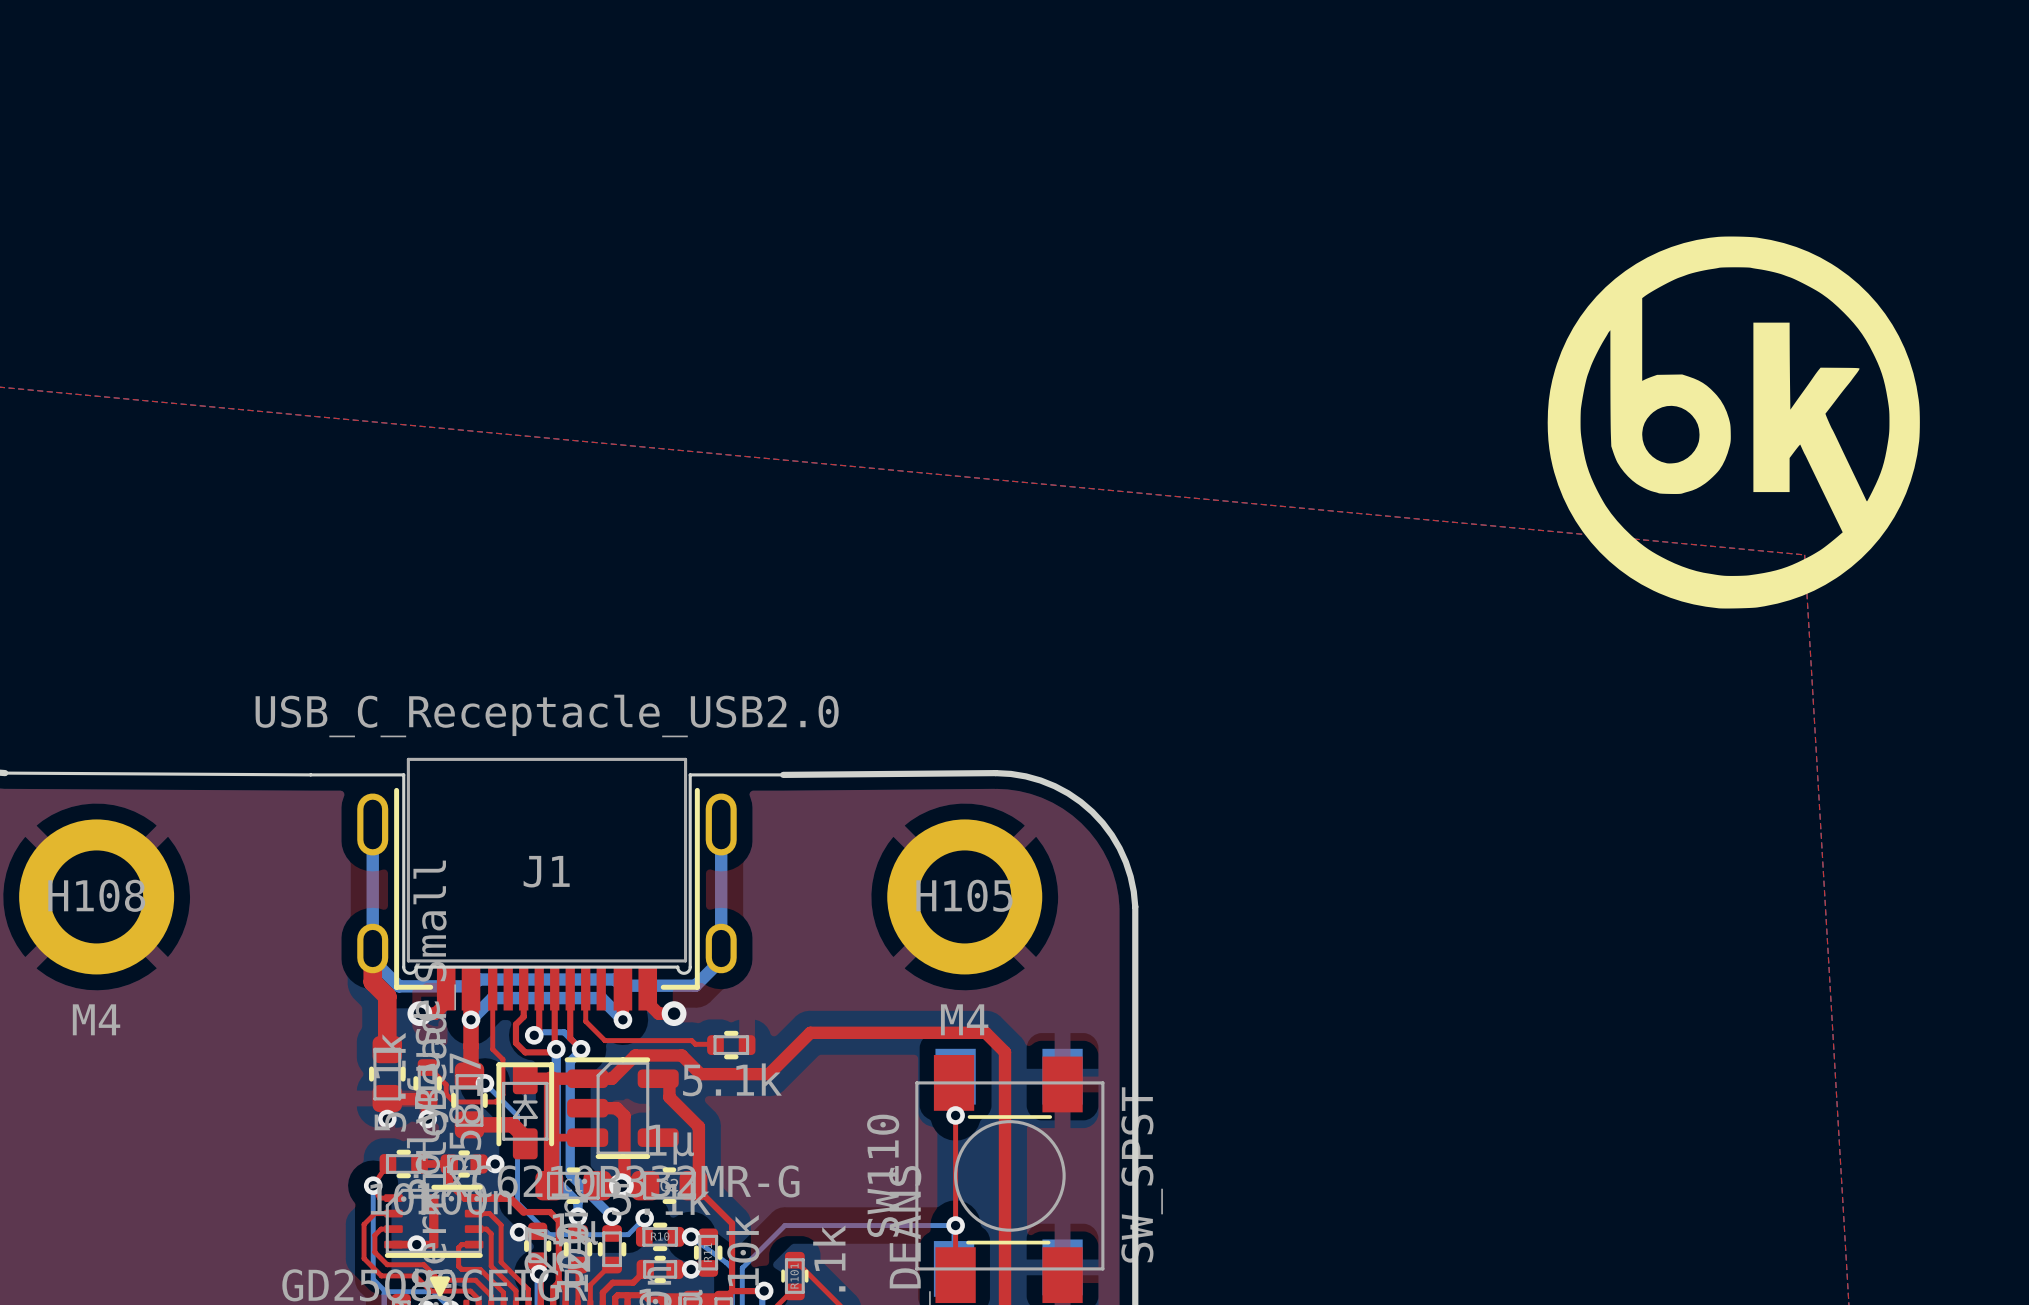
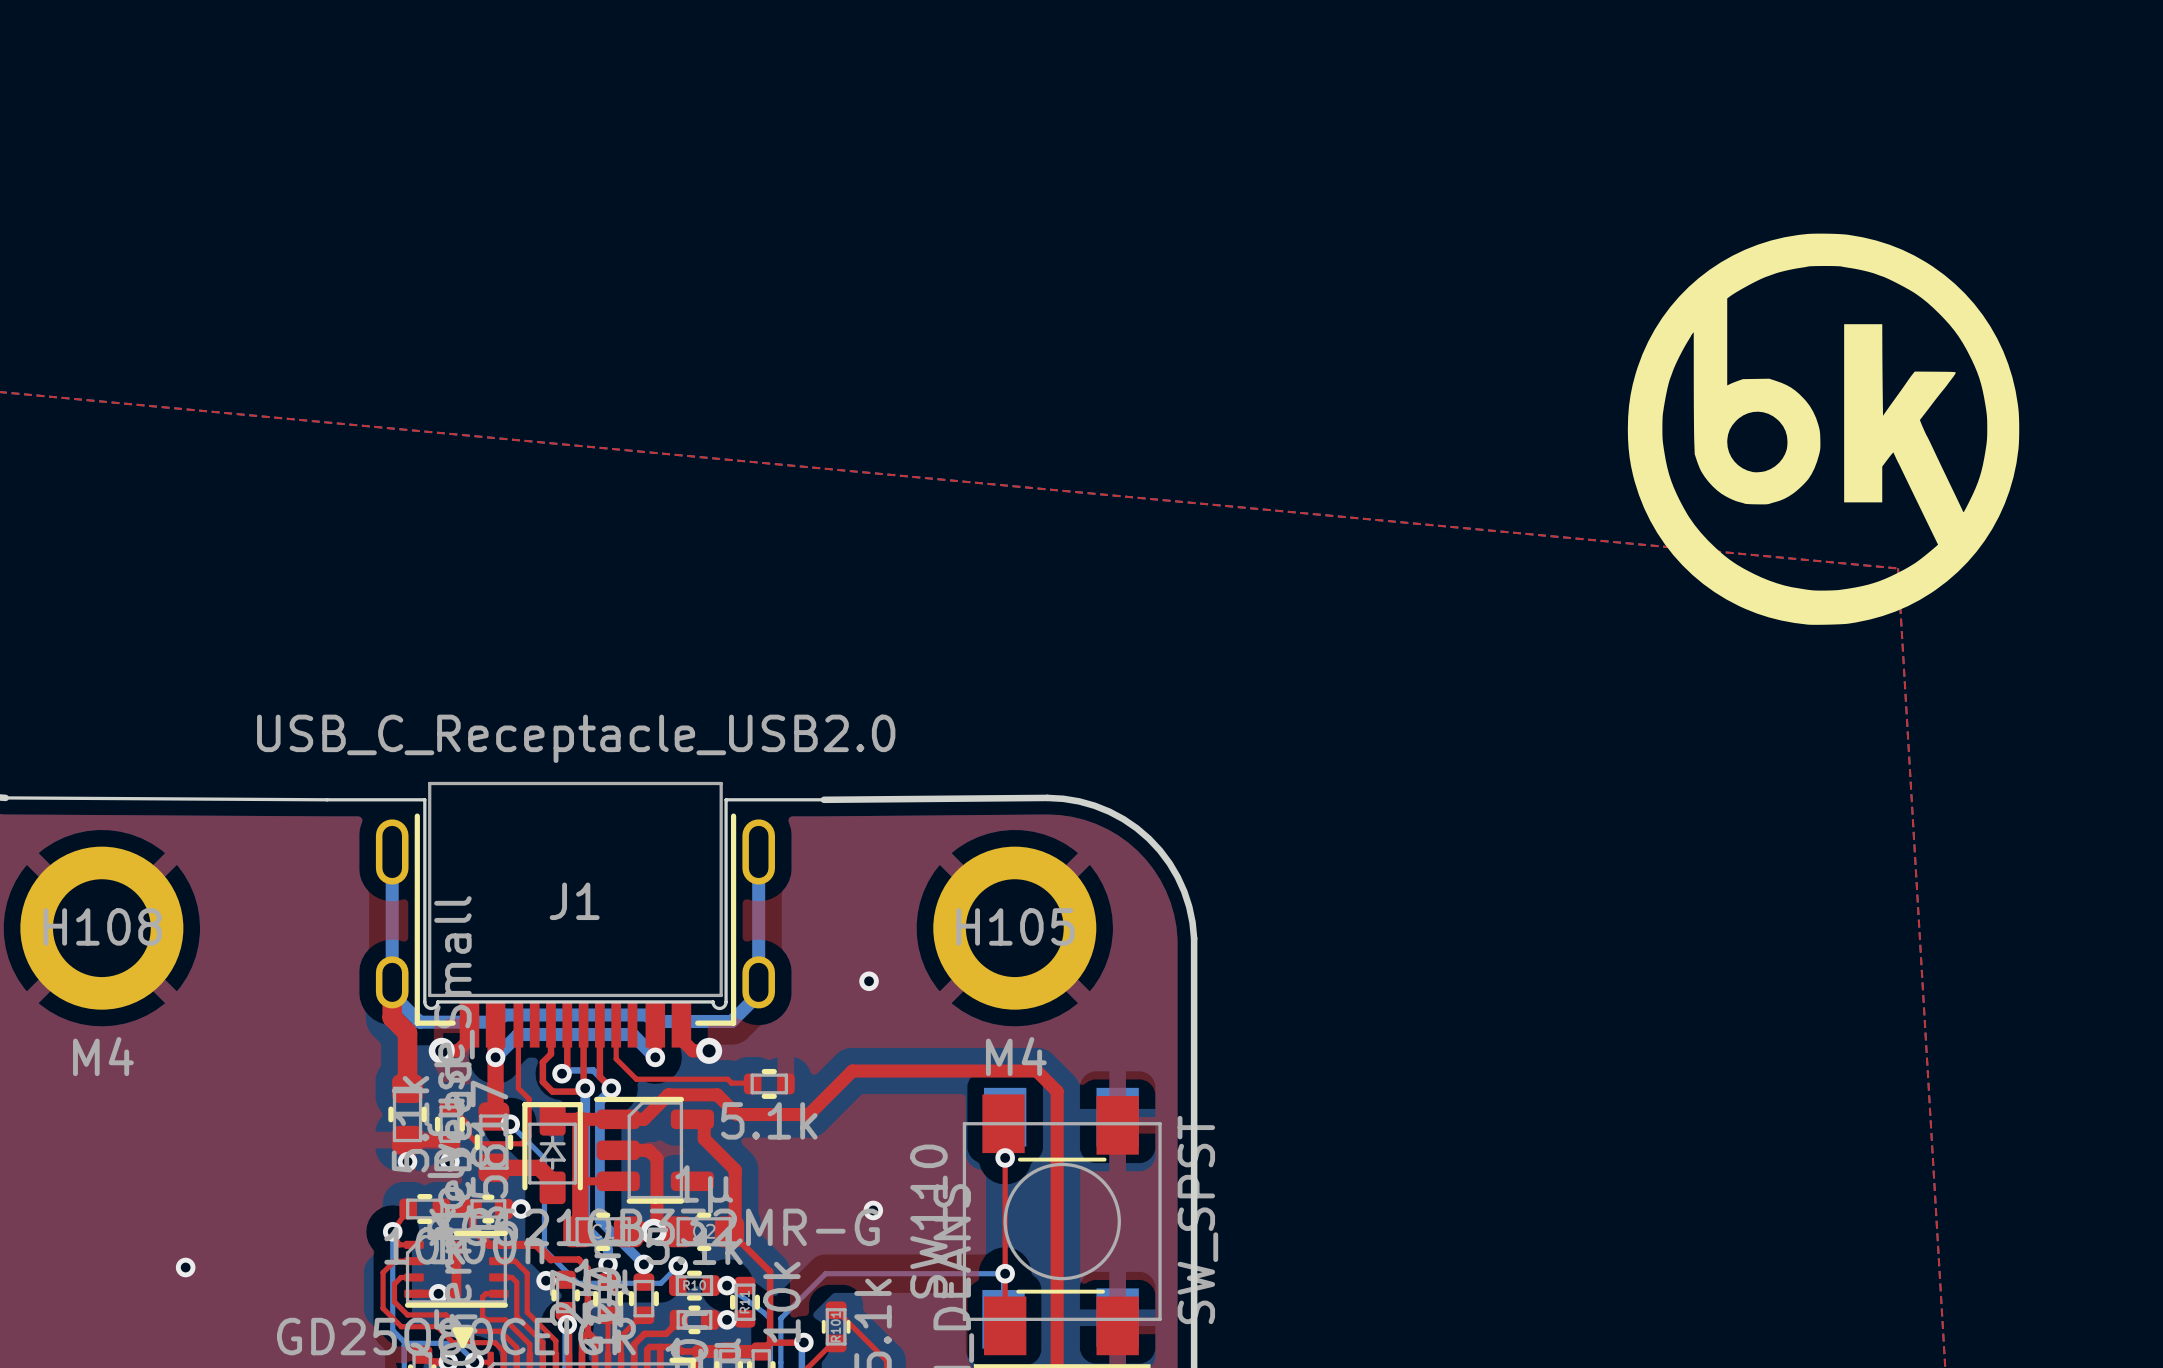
via: none -> (869, 981)
via: none -> (873, 1210)
via: none -> (185, 1267)

